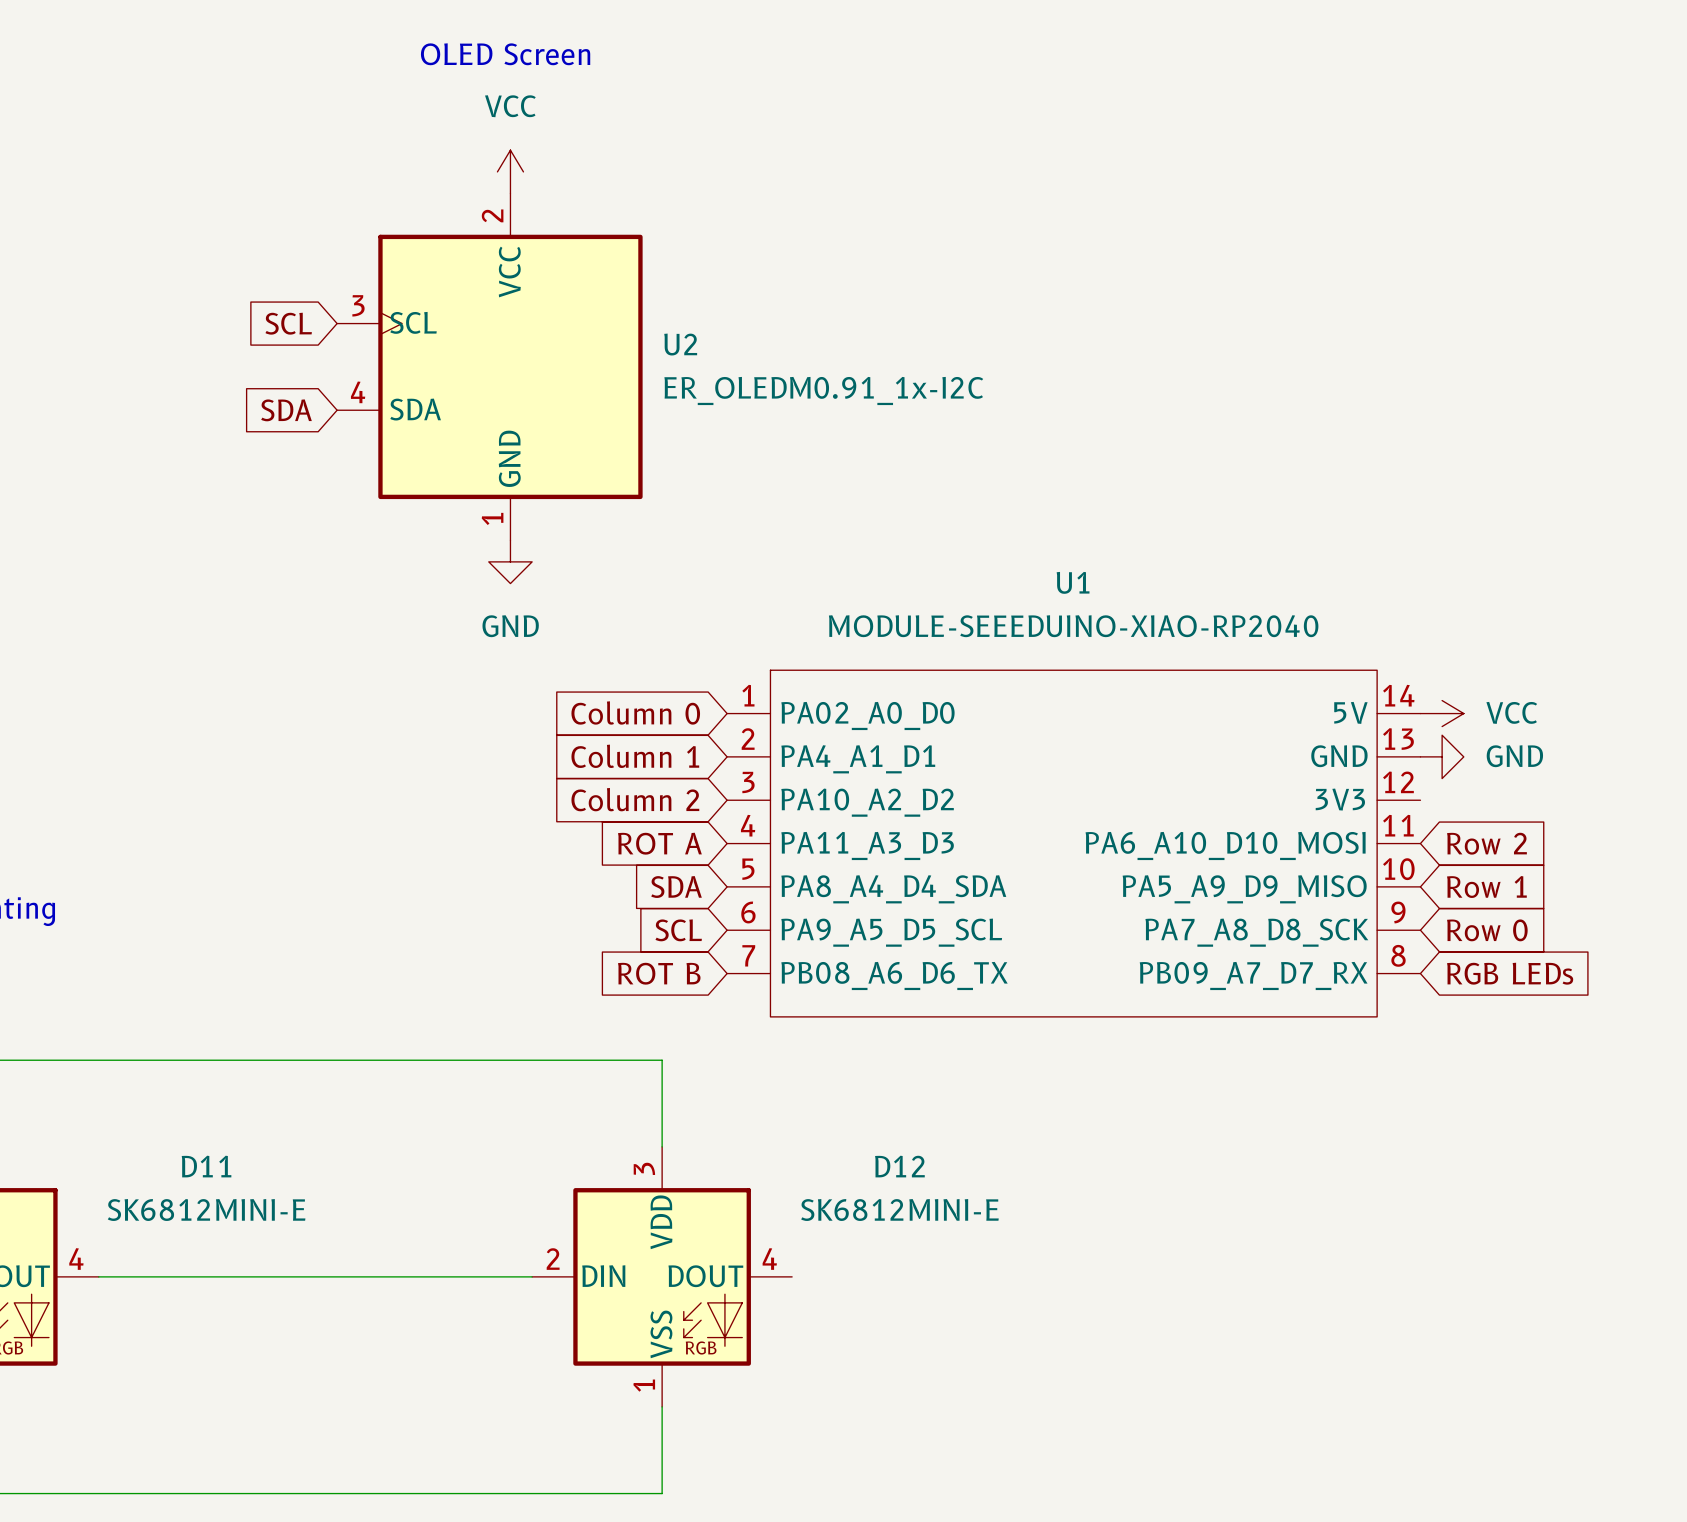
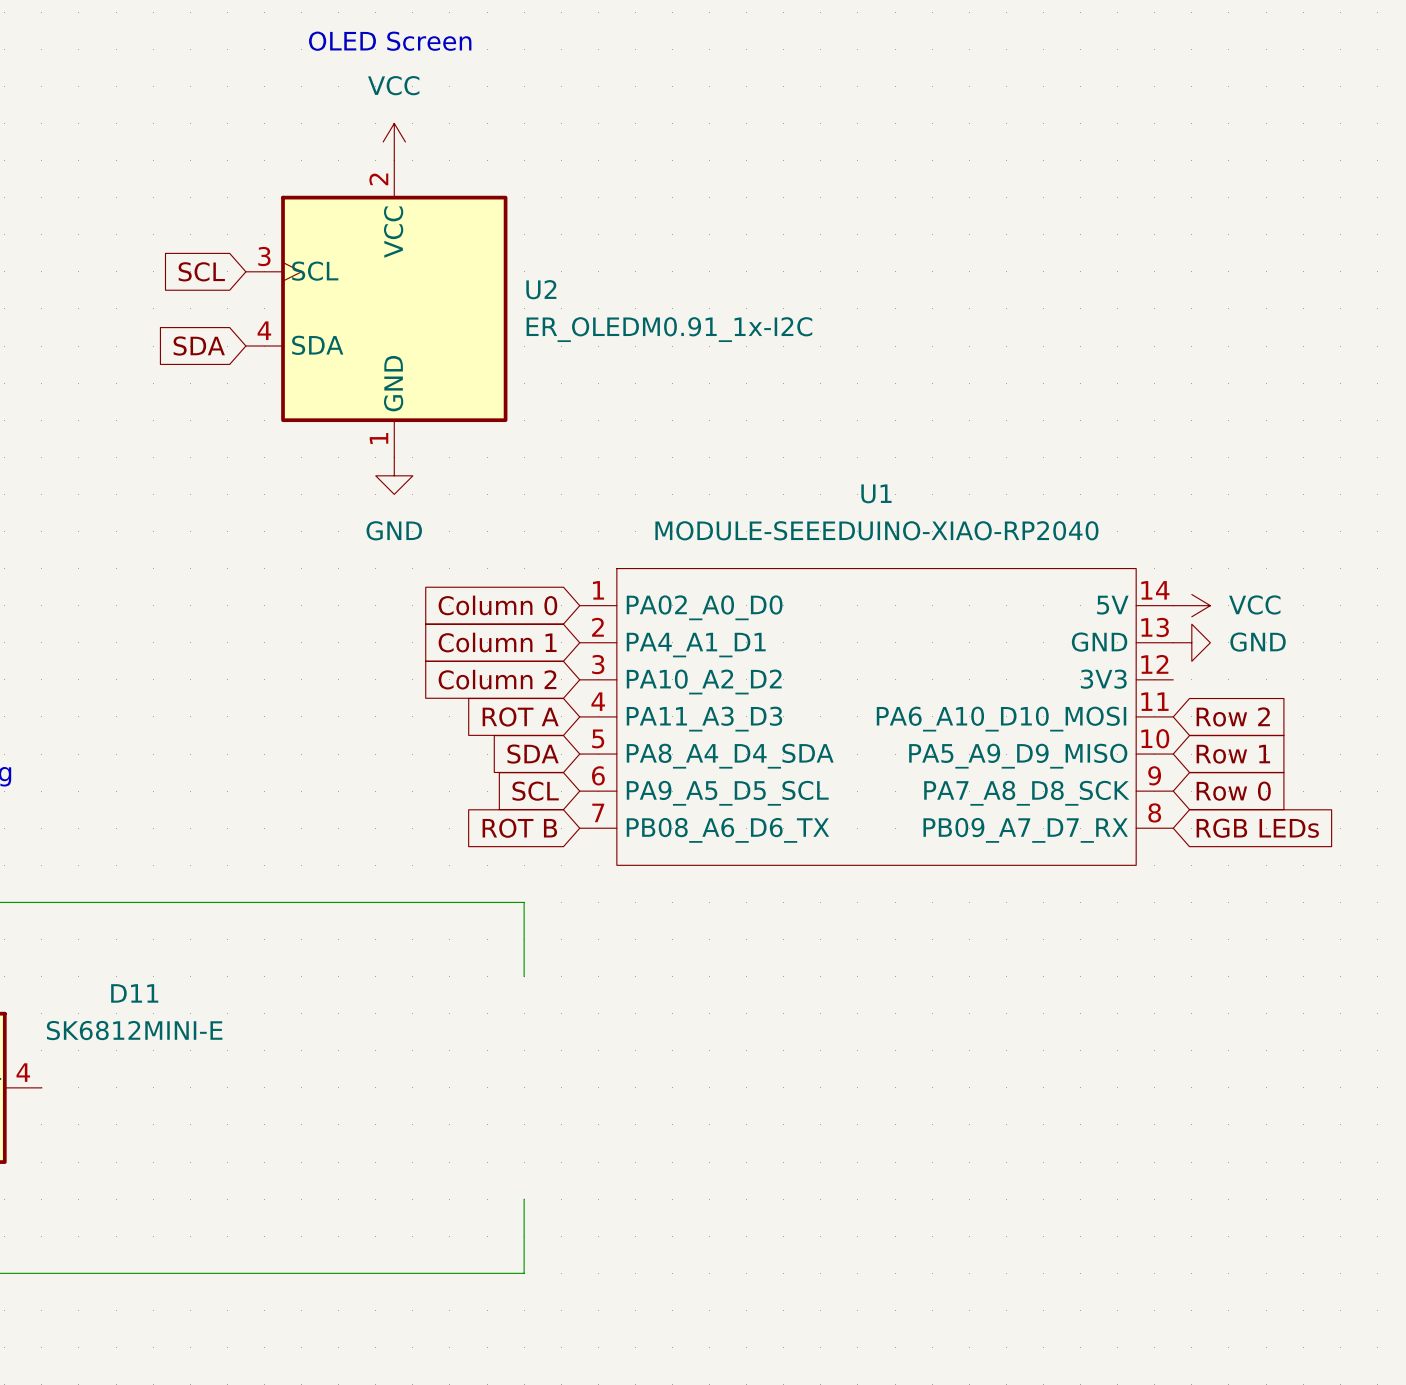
wire: (98, 1276) (532, 1276) -> none
D12: SK6812MINI-E (662, 1276) -> none

